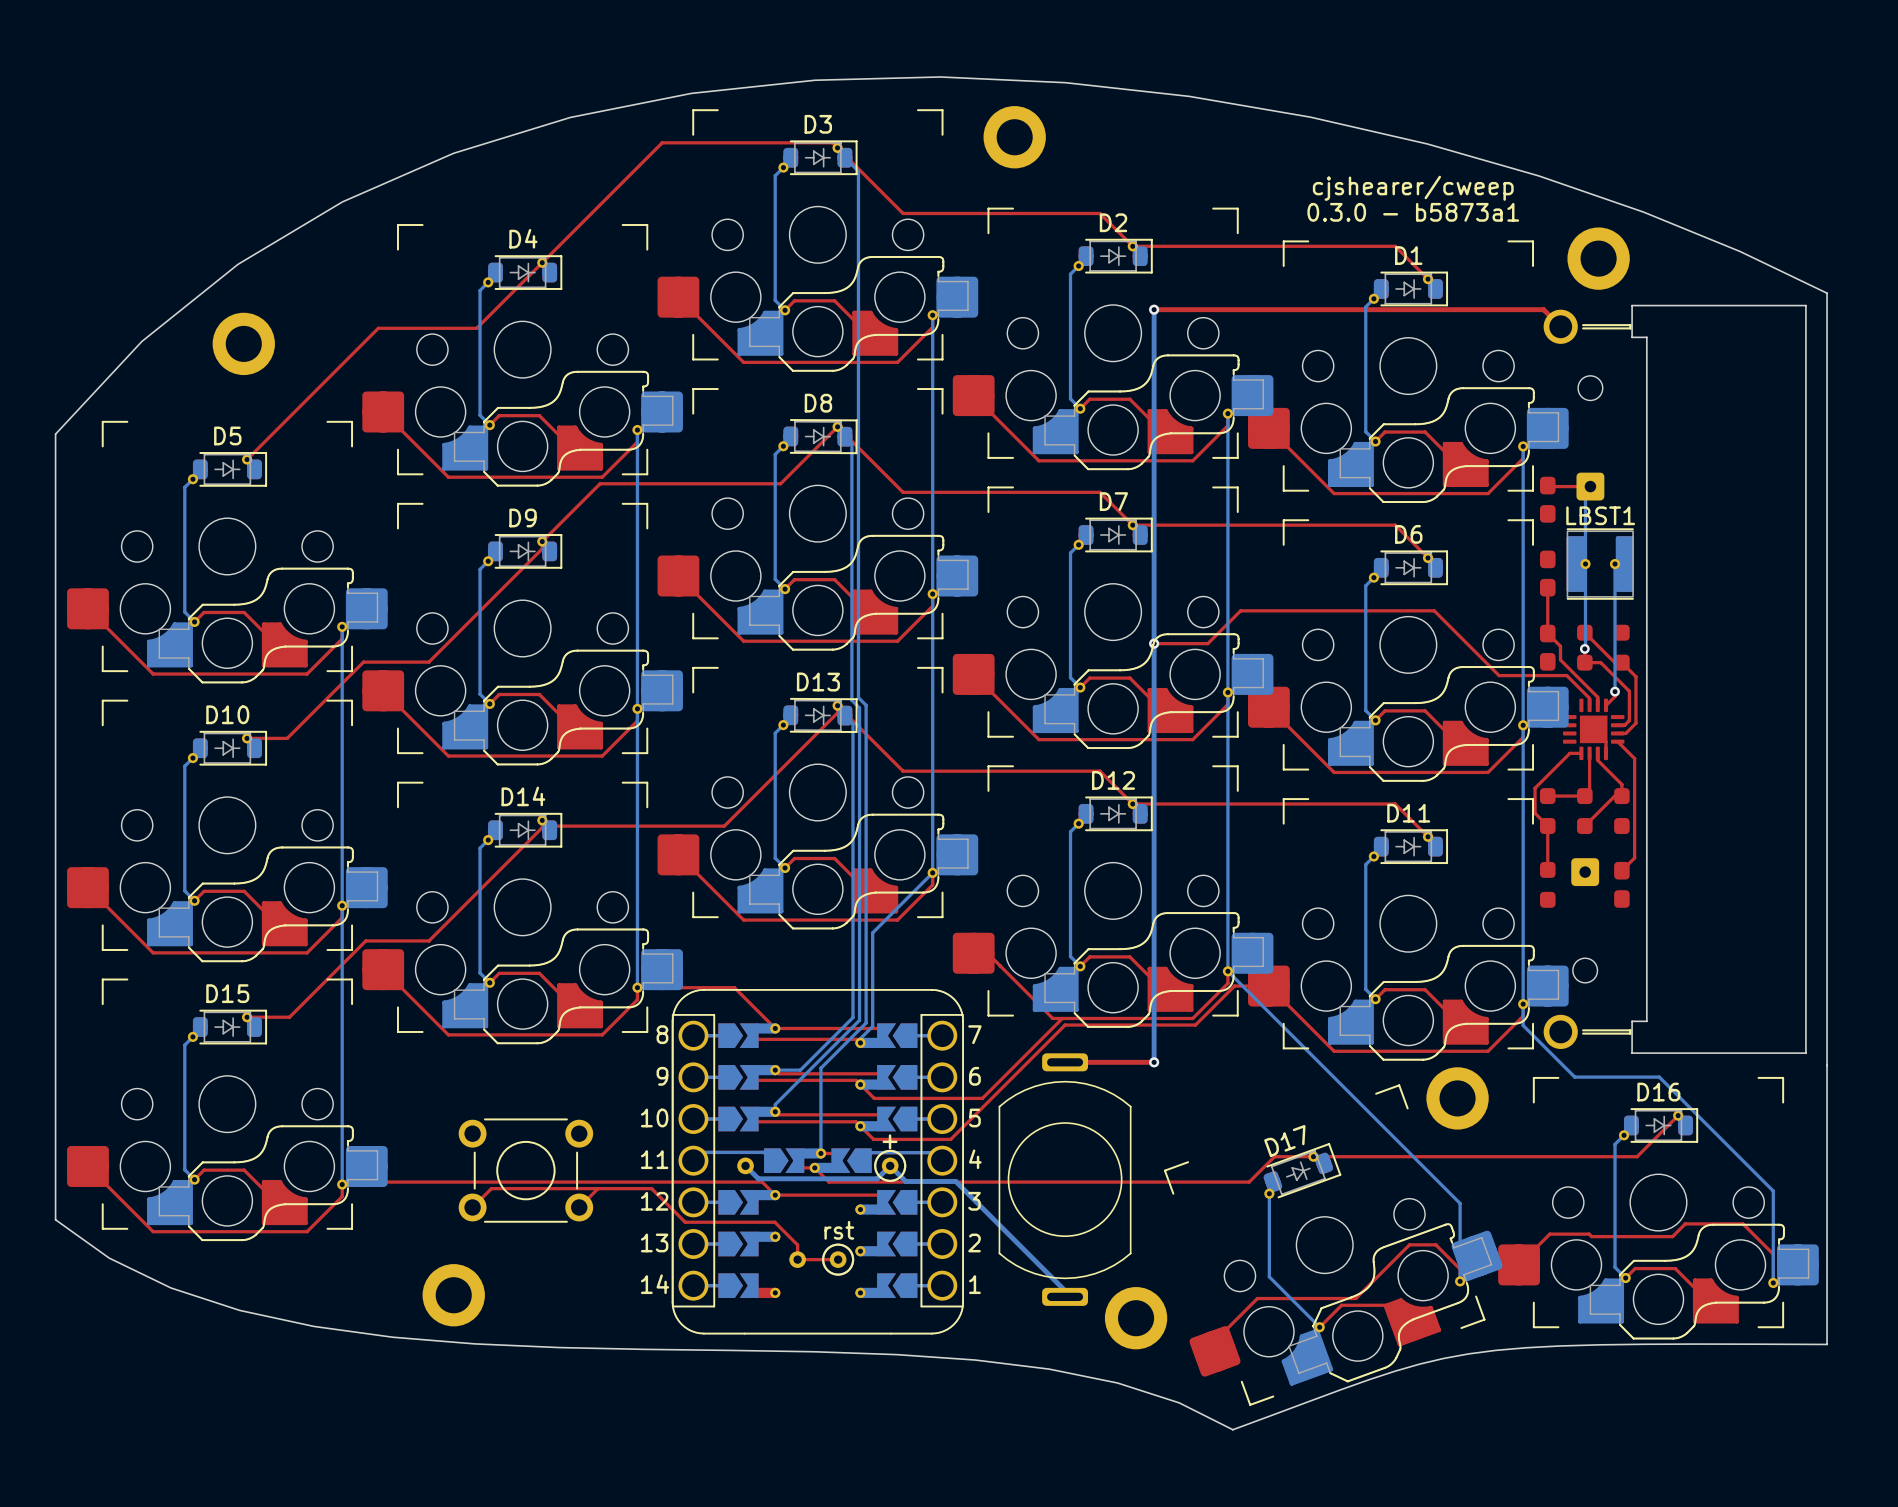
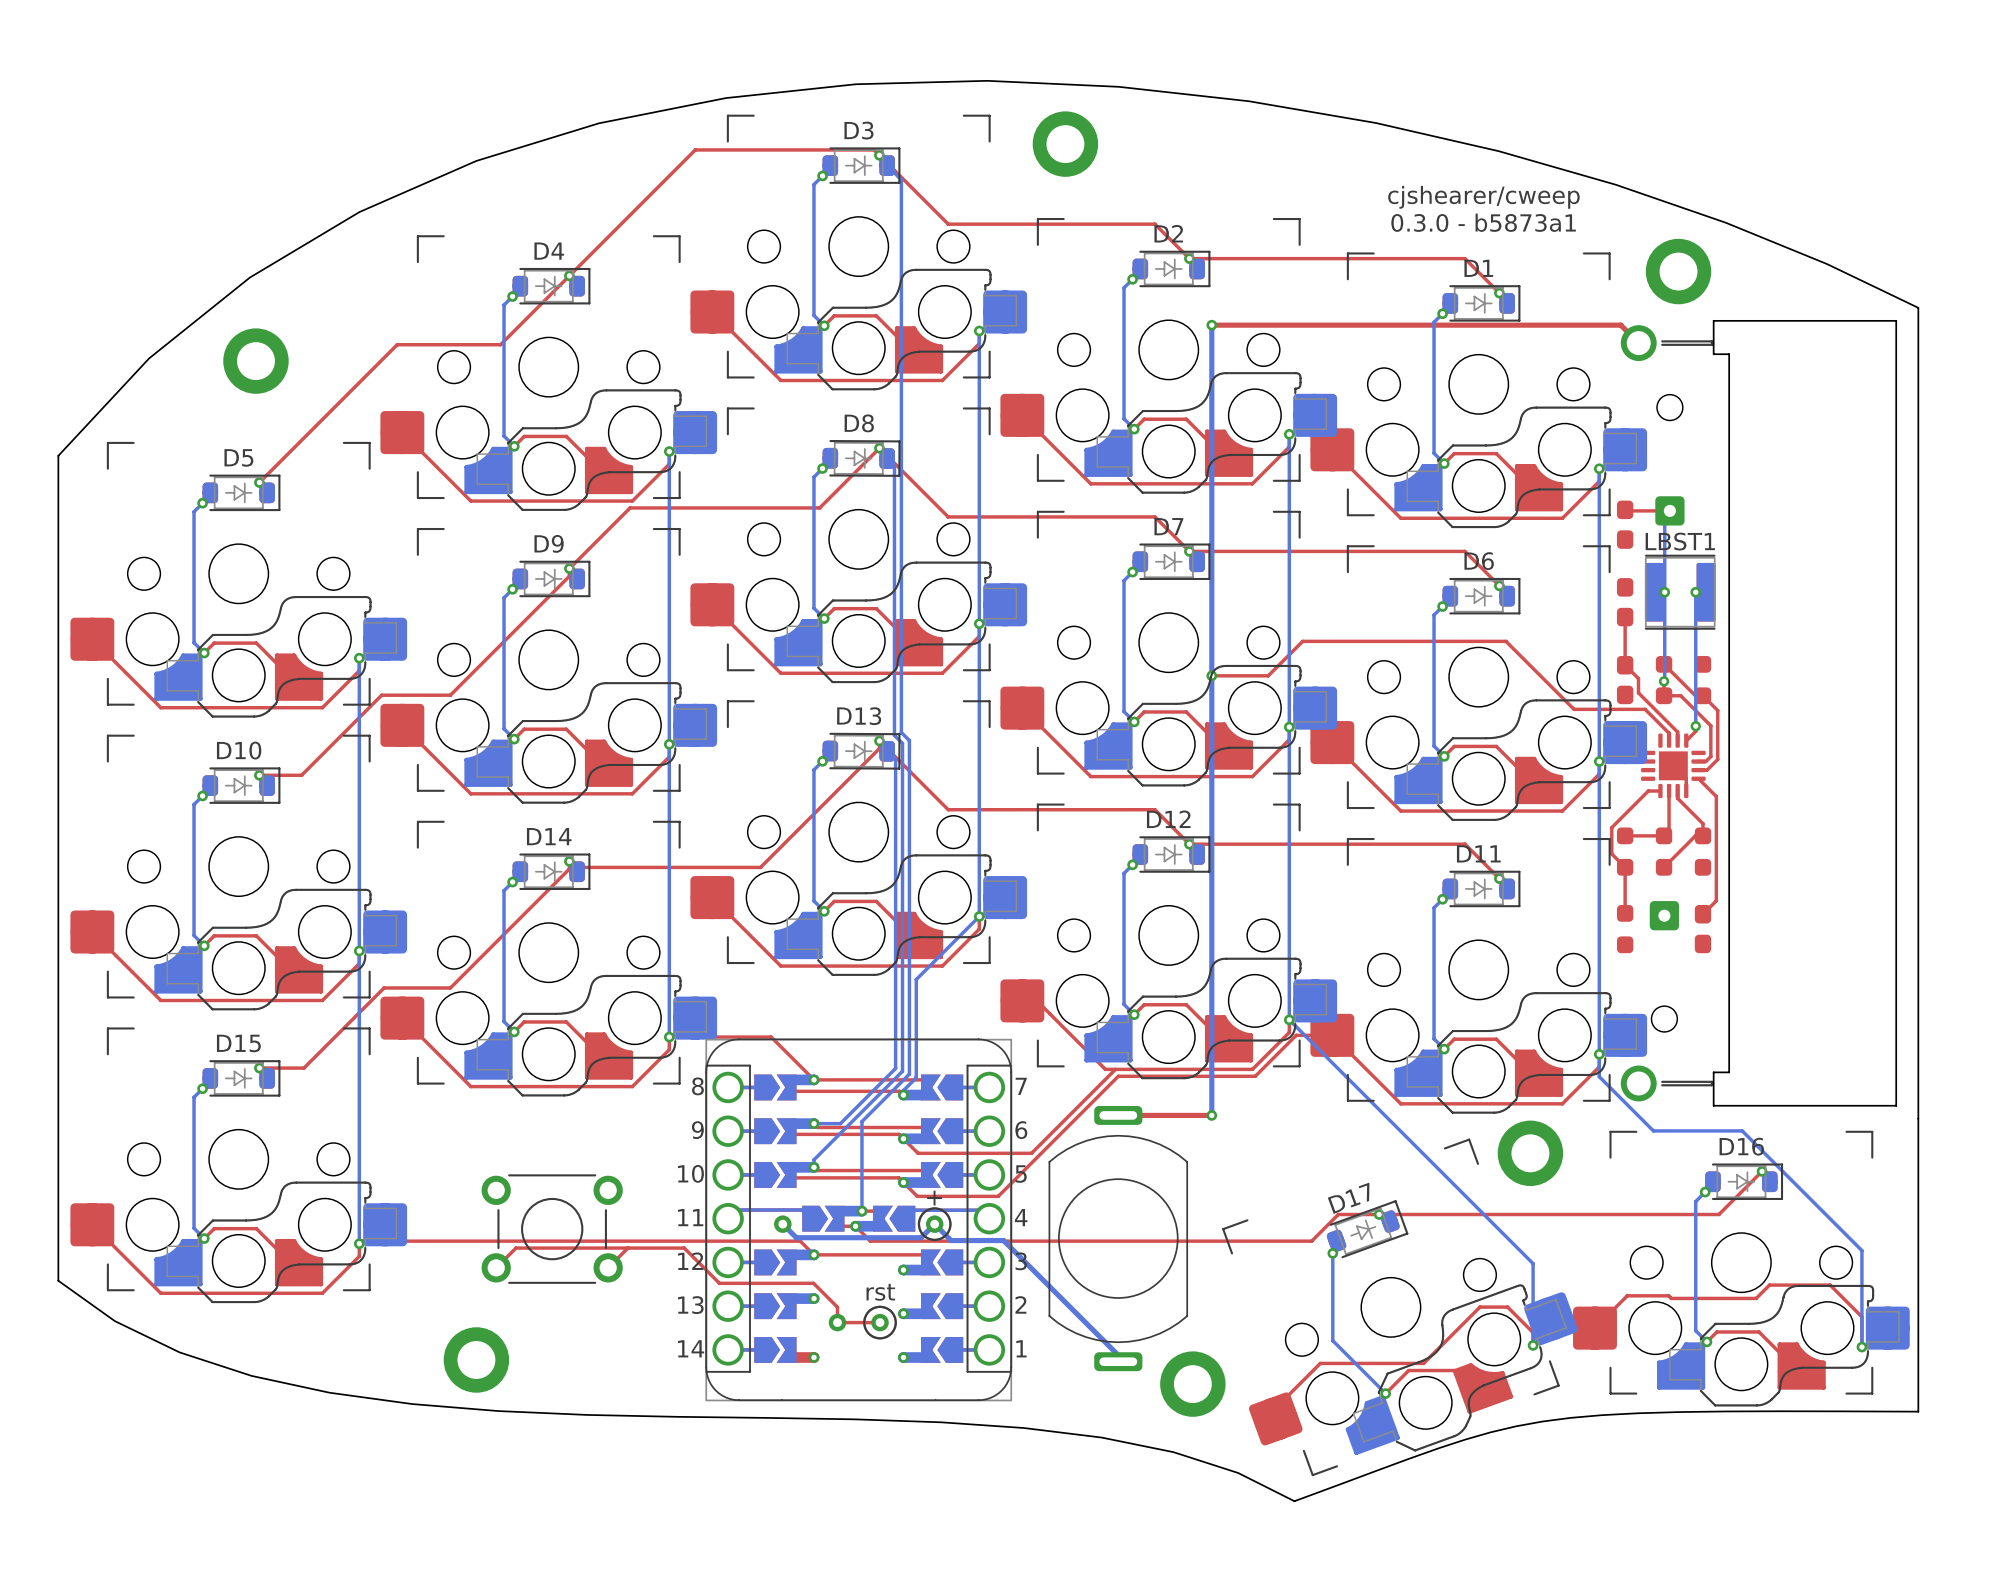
part footprint: [671, 989, 964, 1335] -> [705, 1038, 1013, 1402]

